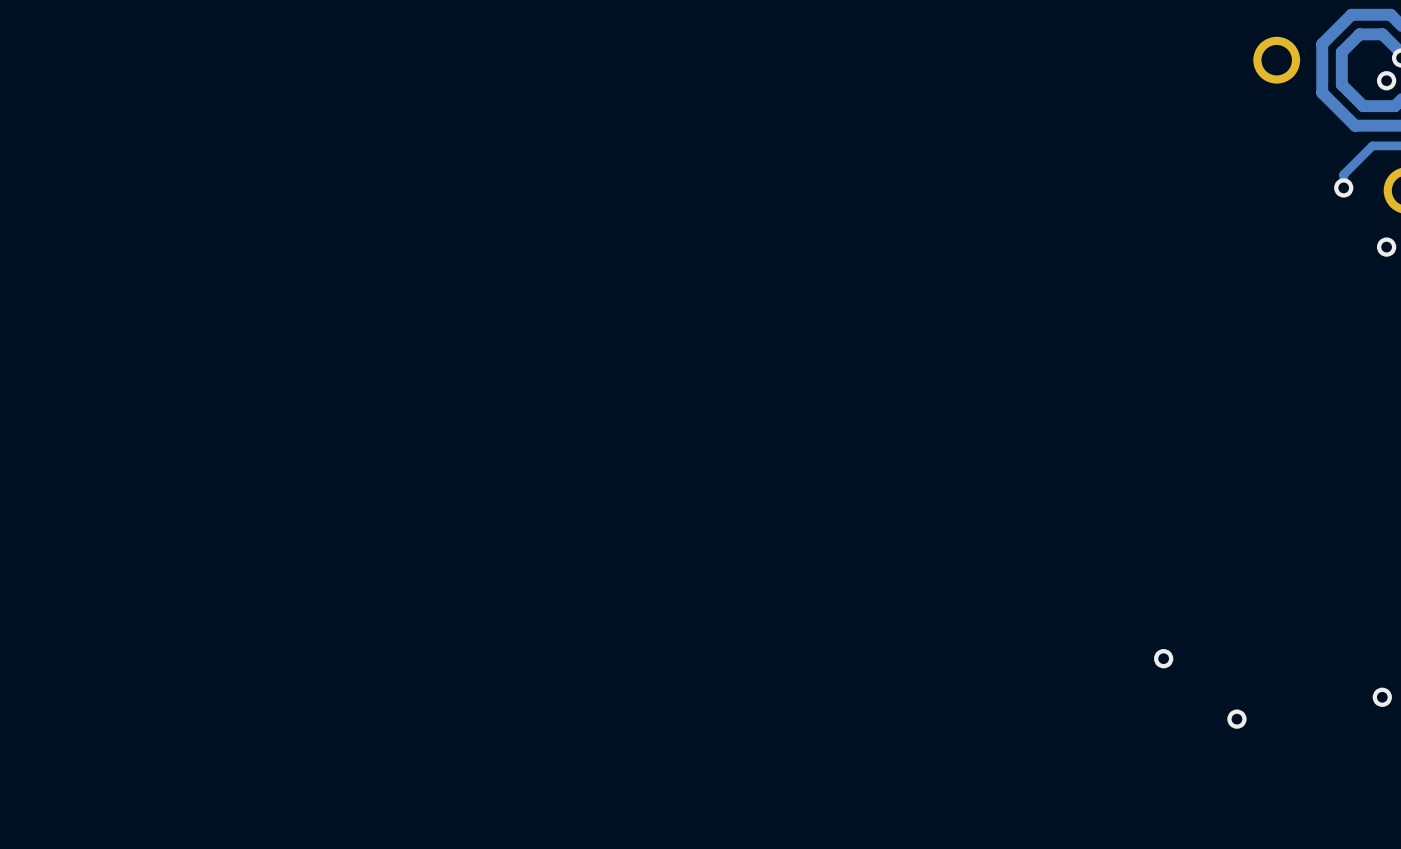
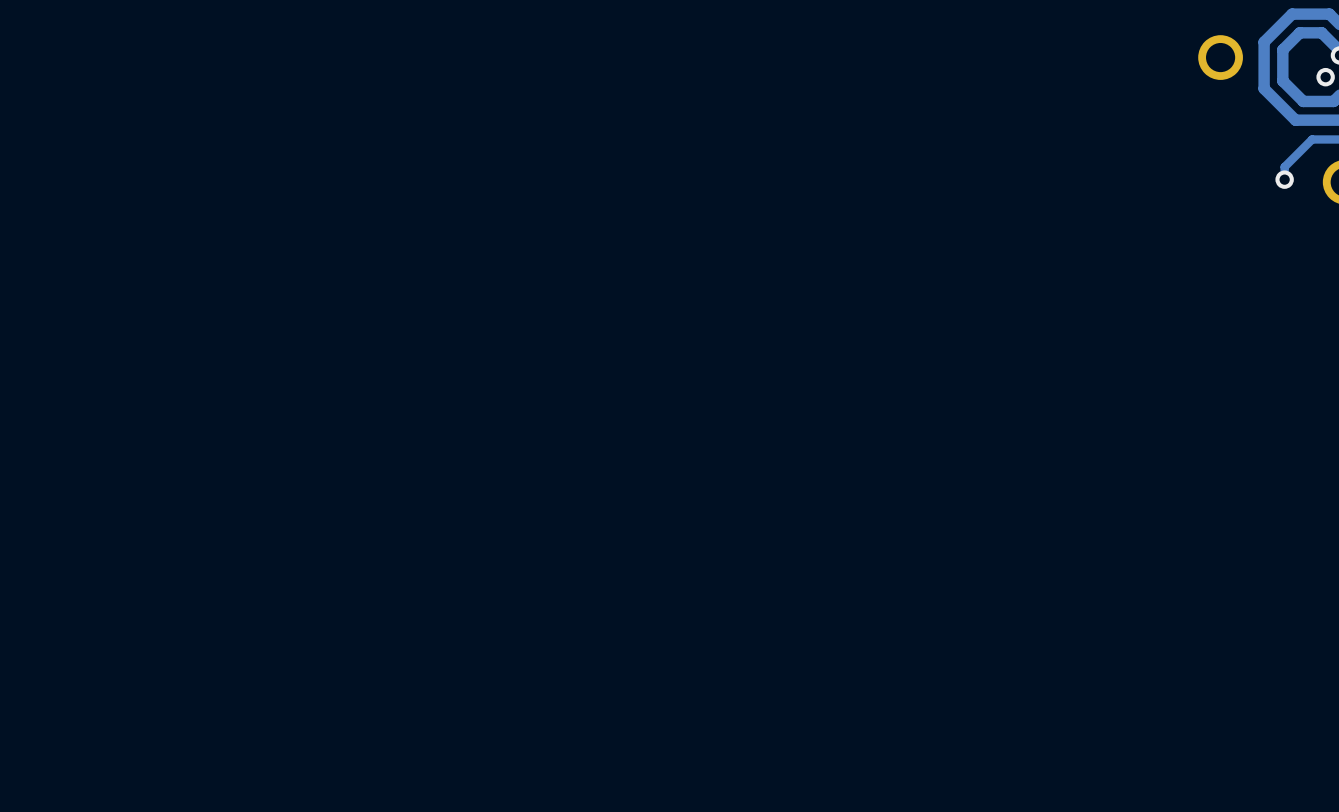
via: (1386, 247) -> none
via: (1163, 658) -> none
via: (1382, 697) -> none
via: (1236, 719) -> none

